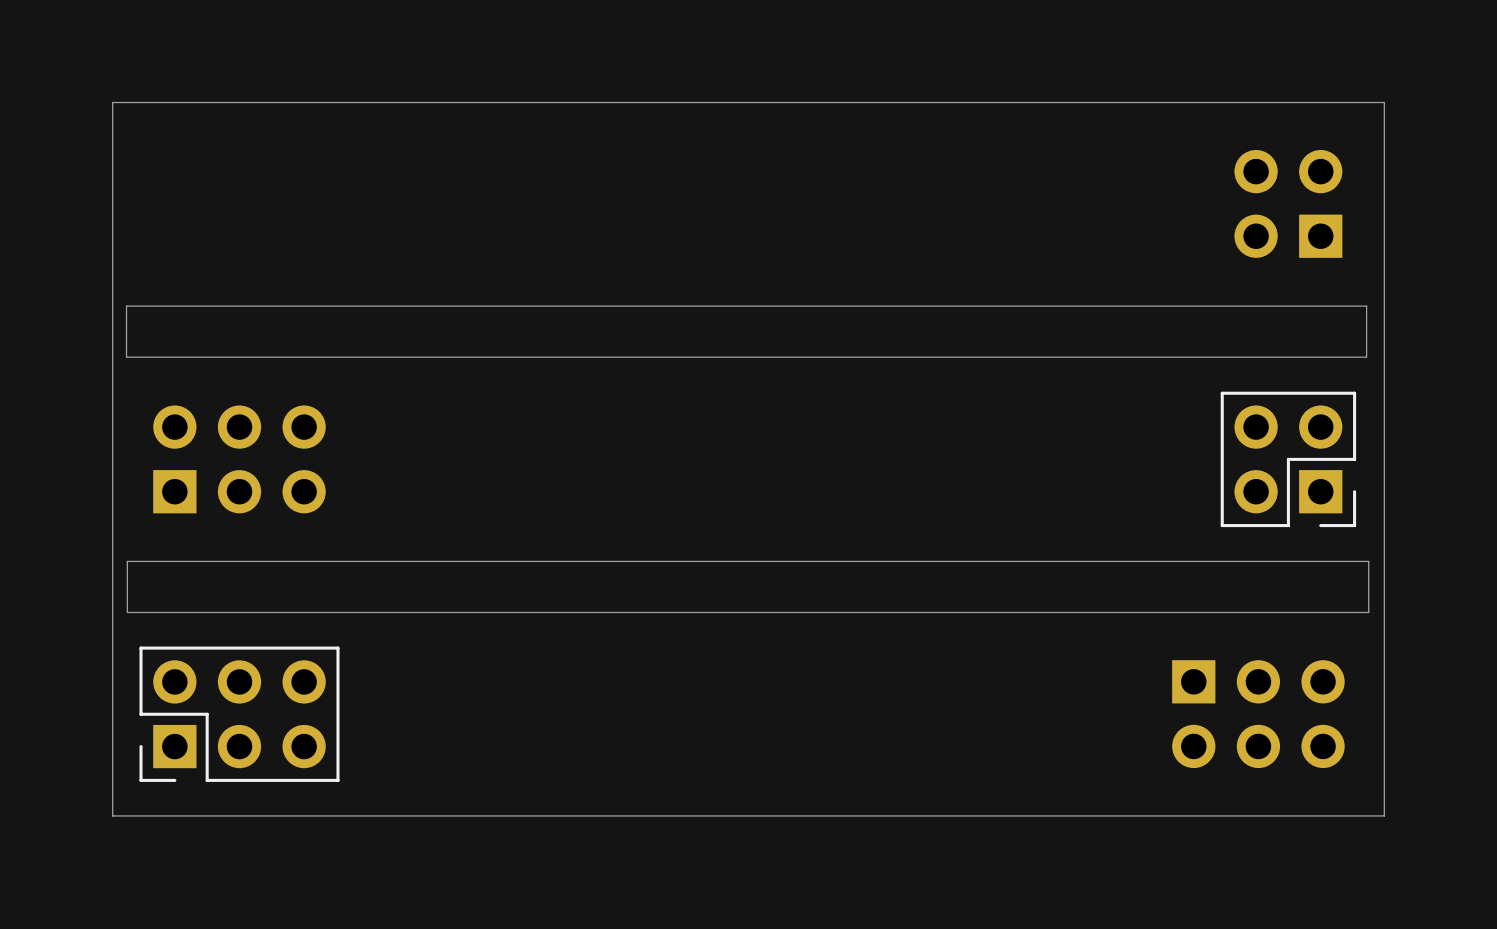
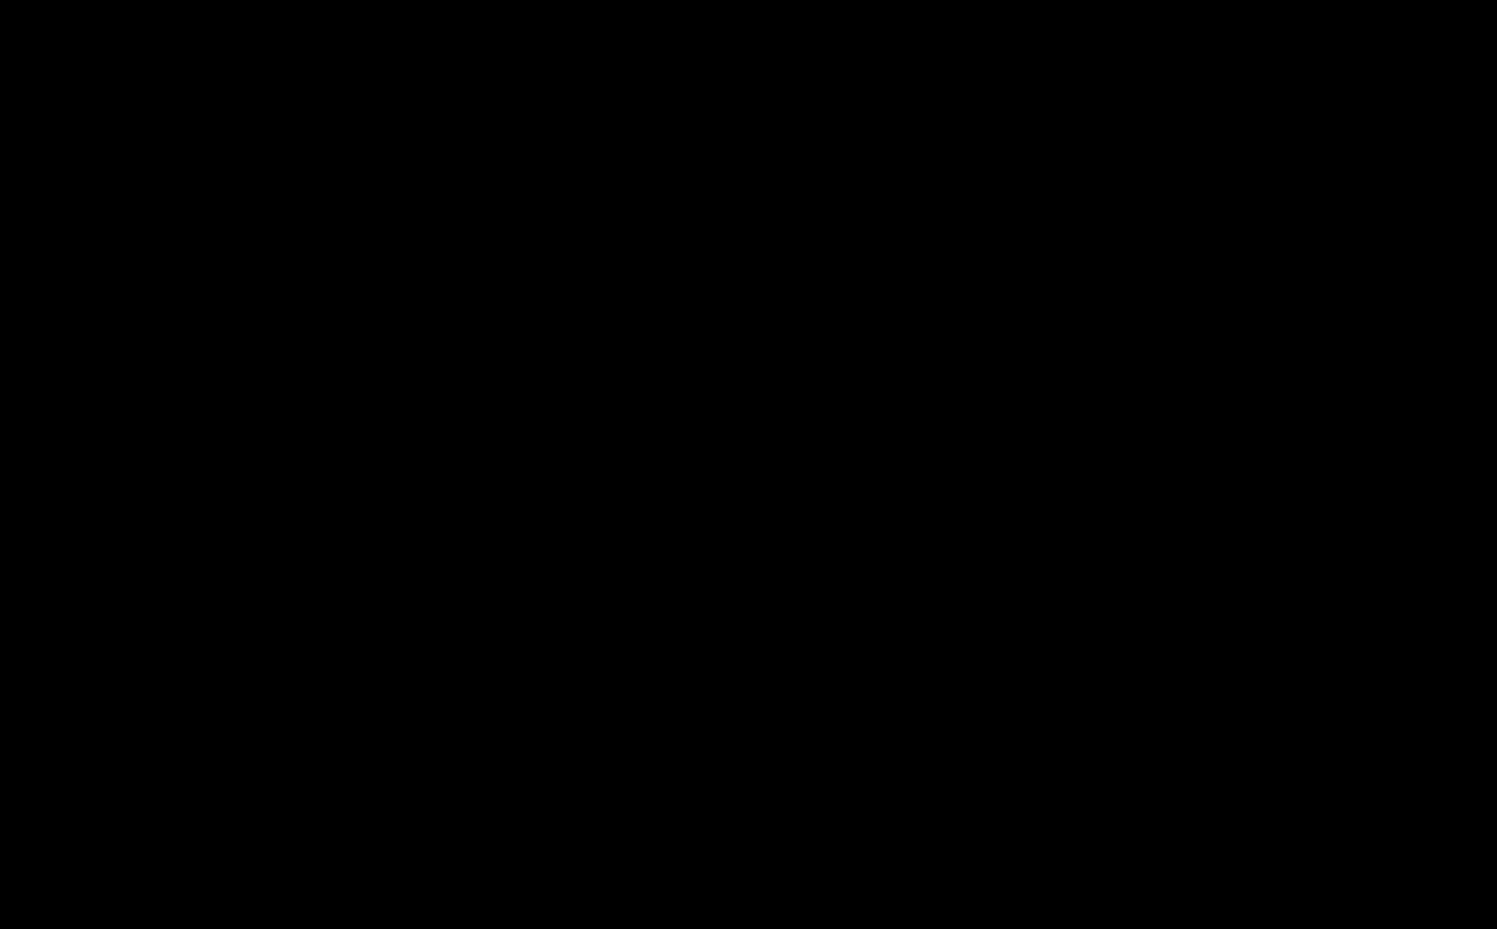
board edge: (1384, 102) (112, 102) (112, 815) (1384, 815) (1384, 102) -> none
part: (1288, 203) -> none
board edge: (1366, 306) (126, 306) (126, 357) (1366, 357) (1366, 306) -> none
part: (239, 459) -> none
part: (1288, 459) -> none
board edge: (1368, 561) (127, 561) (127, 612) (1368, 612) (1368, 561) -> none
part: (239, 714) -> none
part: (1258, 714) -> none

